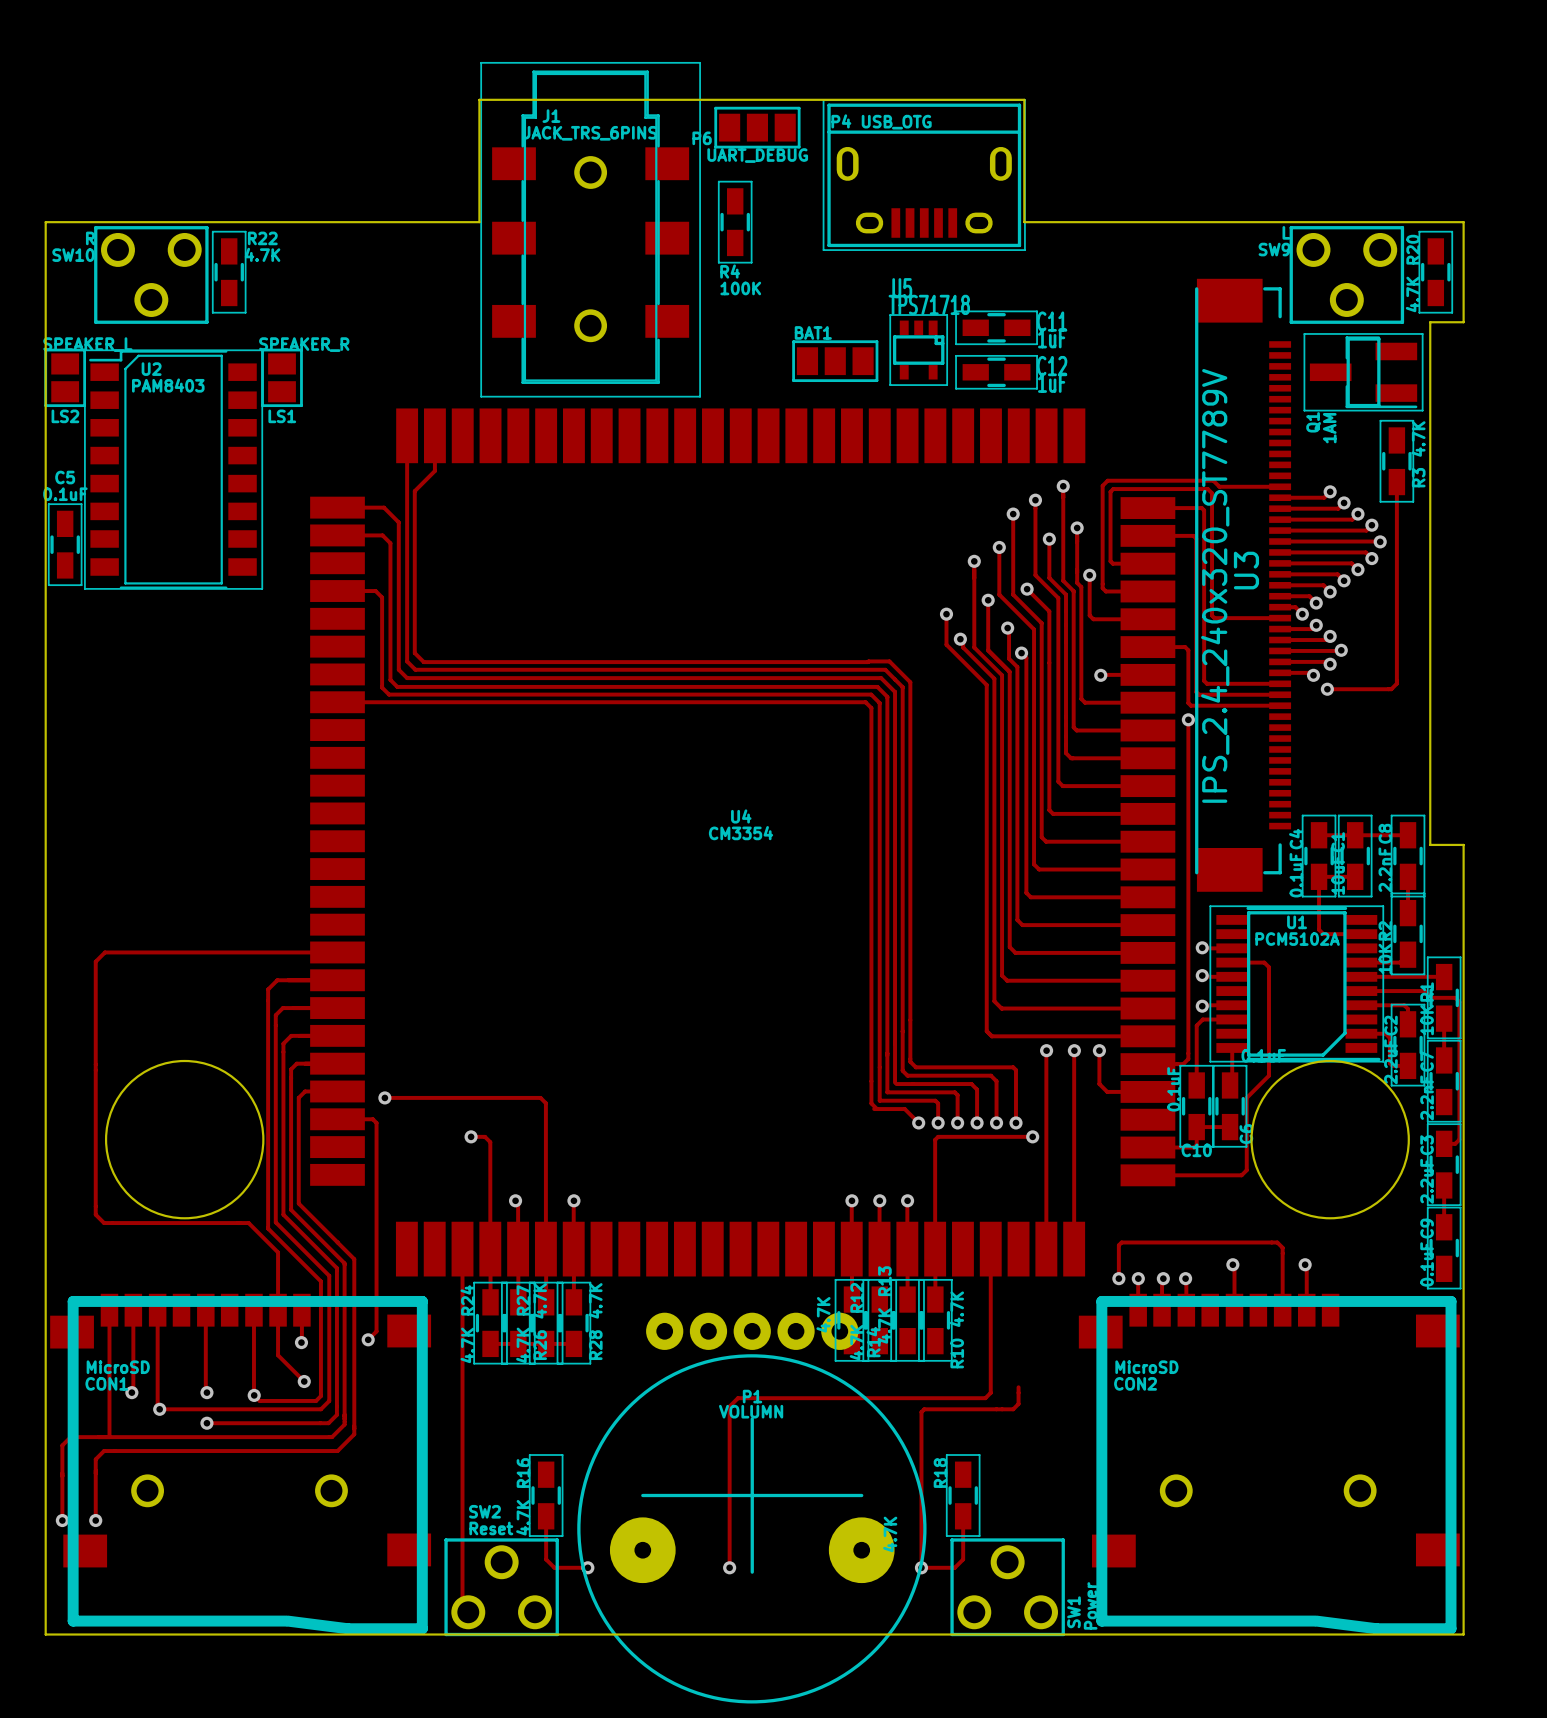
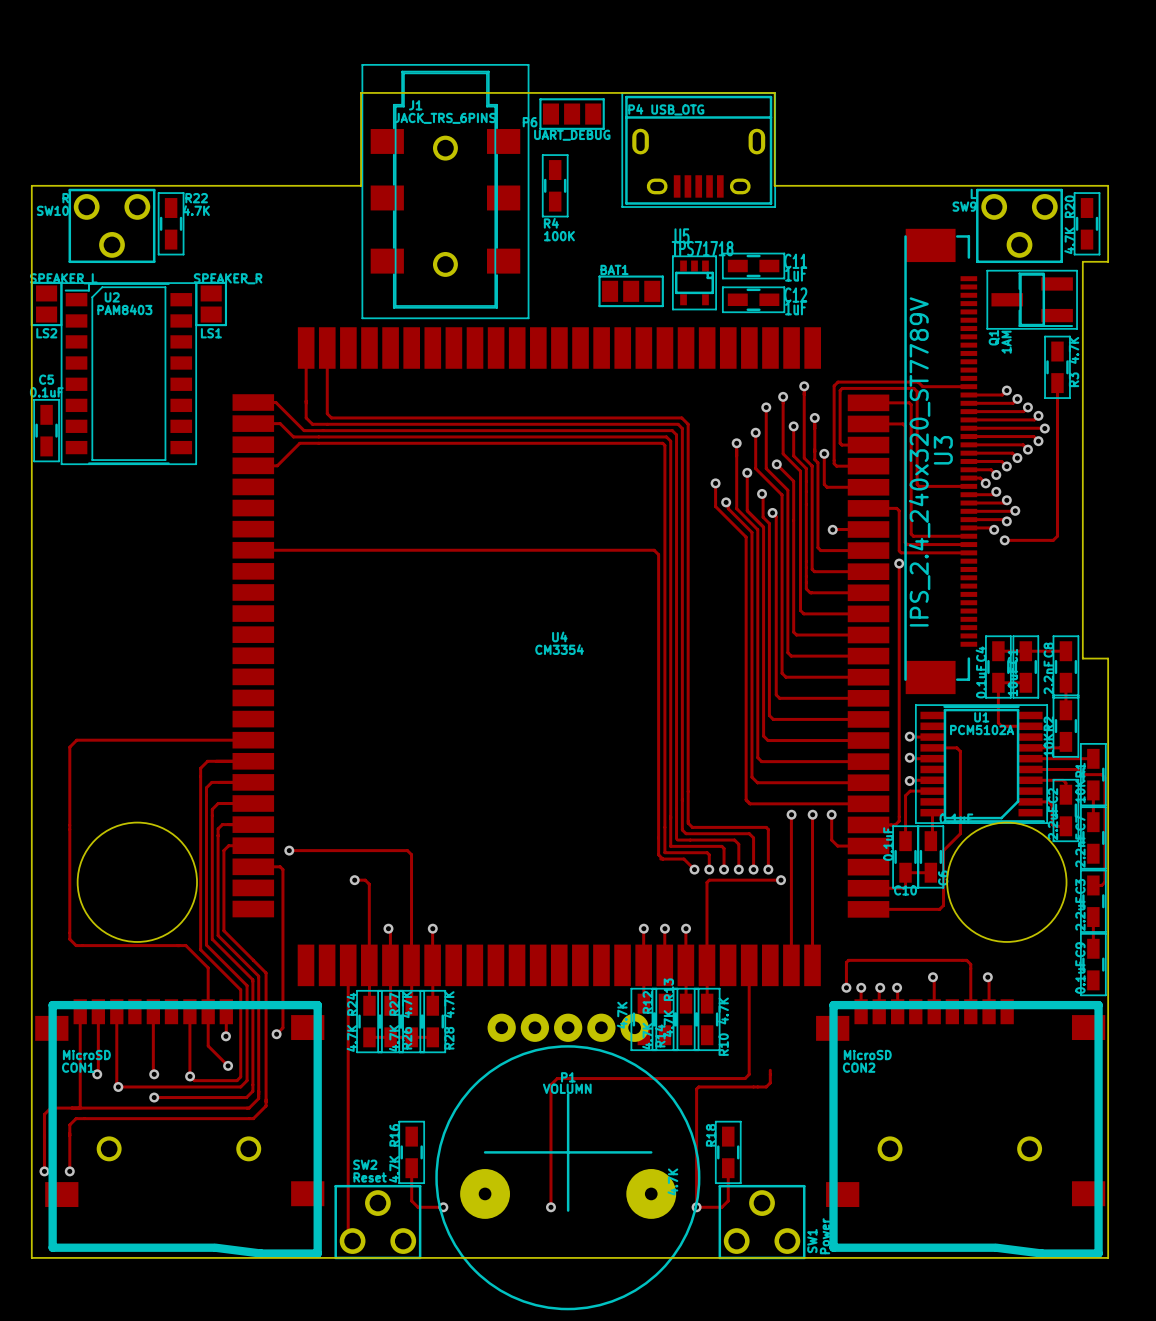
track: (434, 470) (414, 491) (414, 653) (423, 662) (889, 661) (910, 682) -> (327, 374) (327, 413) (331, 417) (681, 417) (688, 424) (688, 535)
track: (367, 507) (383, 507) (398, 522) (398, 669) (407, 678) (881, 678) (895, 691) -> (275, 402) (304, 430) (672, 430) (676, 434) (676, 542)
track: (407, 527) (407, 661) (415, 669) (885, 669) (902, 687) -> (306, 417) (312, 424) (678, 424) (682, 428) (682, 538)
track: (372, 535) (382, 535) (390, 543) (390, 679) (397, 686) (877, 686) (887, 696) -> (280, 423) (293, 436) (666, 436) (670, 441) (670, 546)
track: (369, 591) (375, 591) (382, 597) (382, 687) (389, 694) (871, 694) (879, 703) -> (277, 465) (299, 443) (662, 443) (664, 445) (664, 550)

